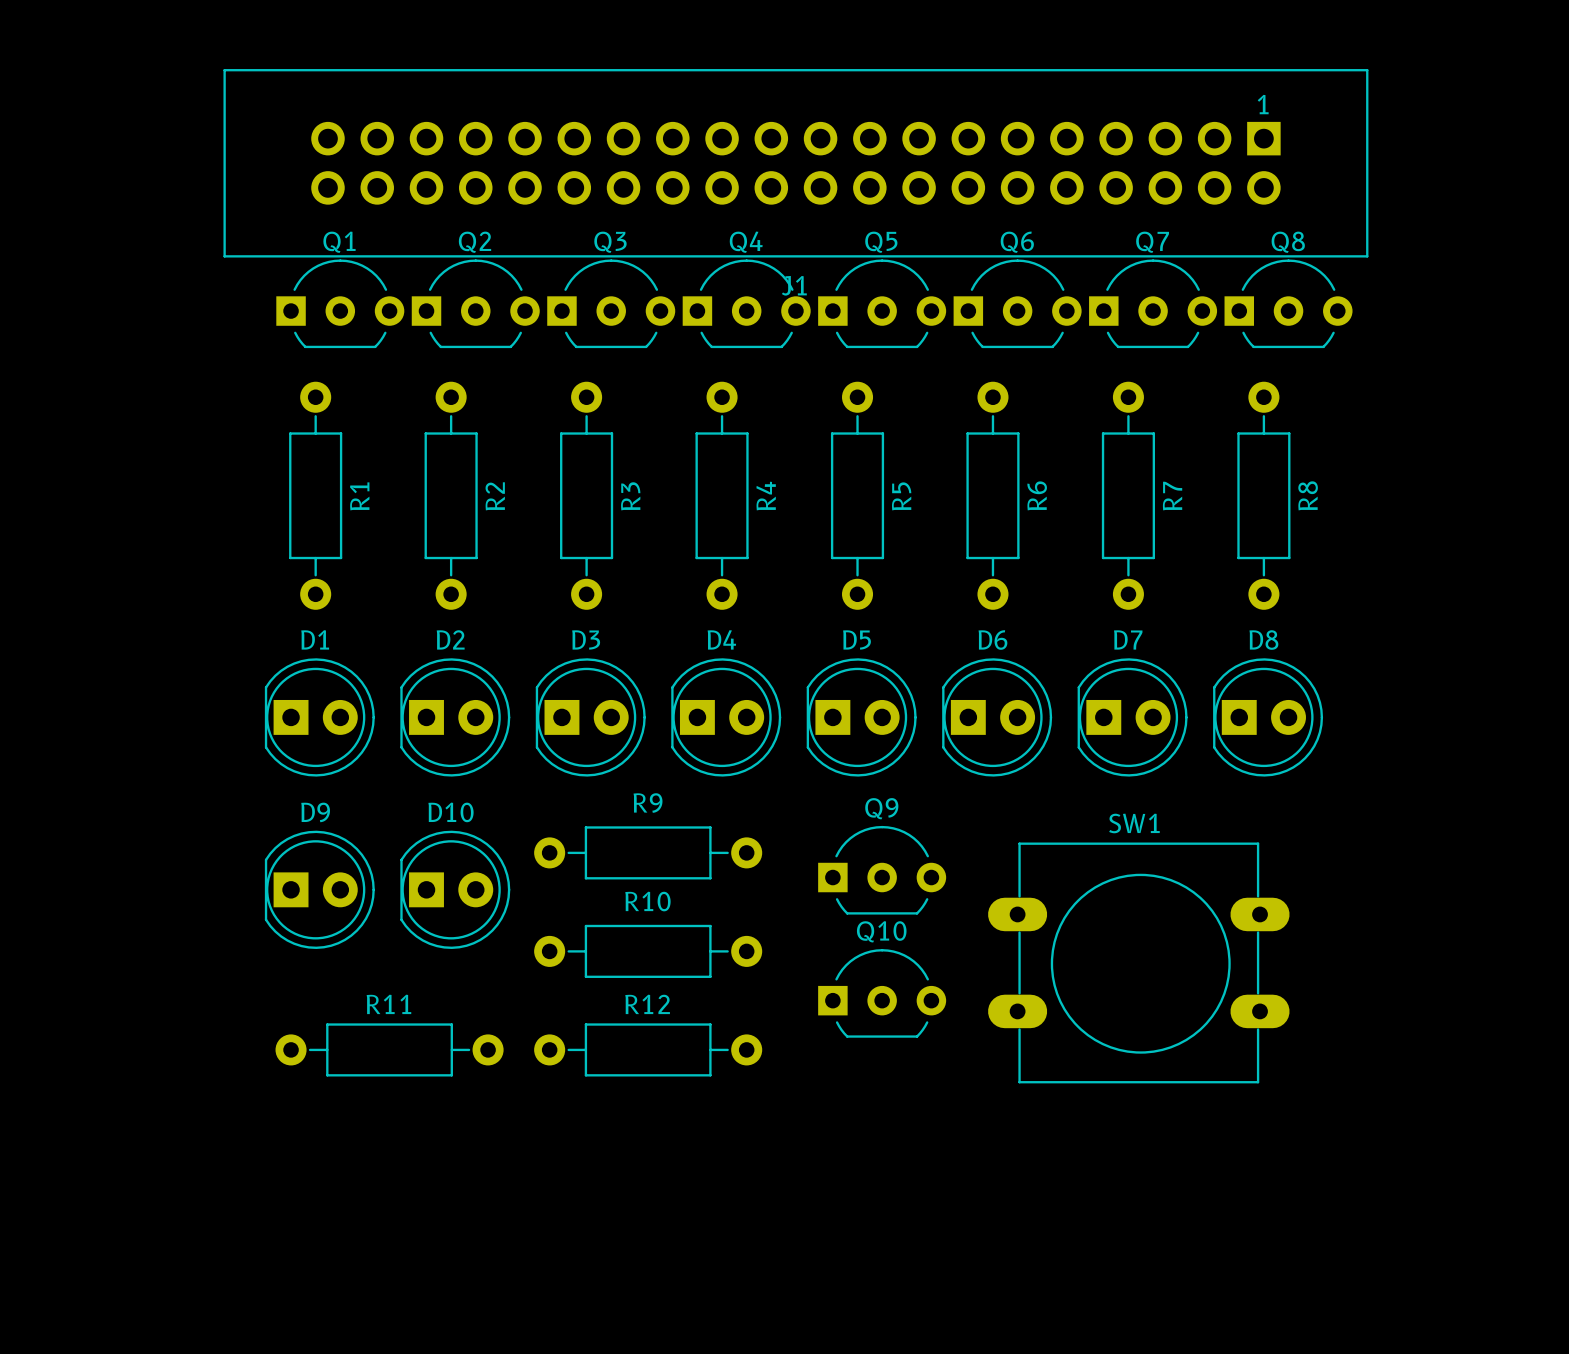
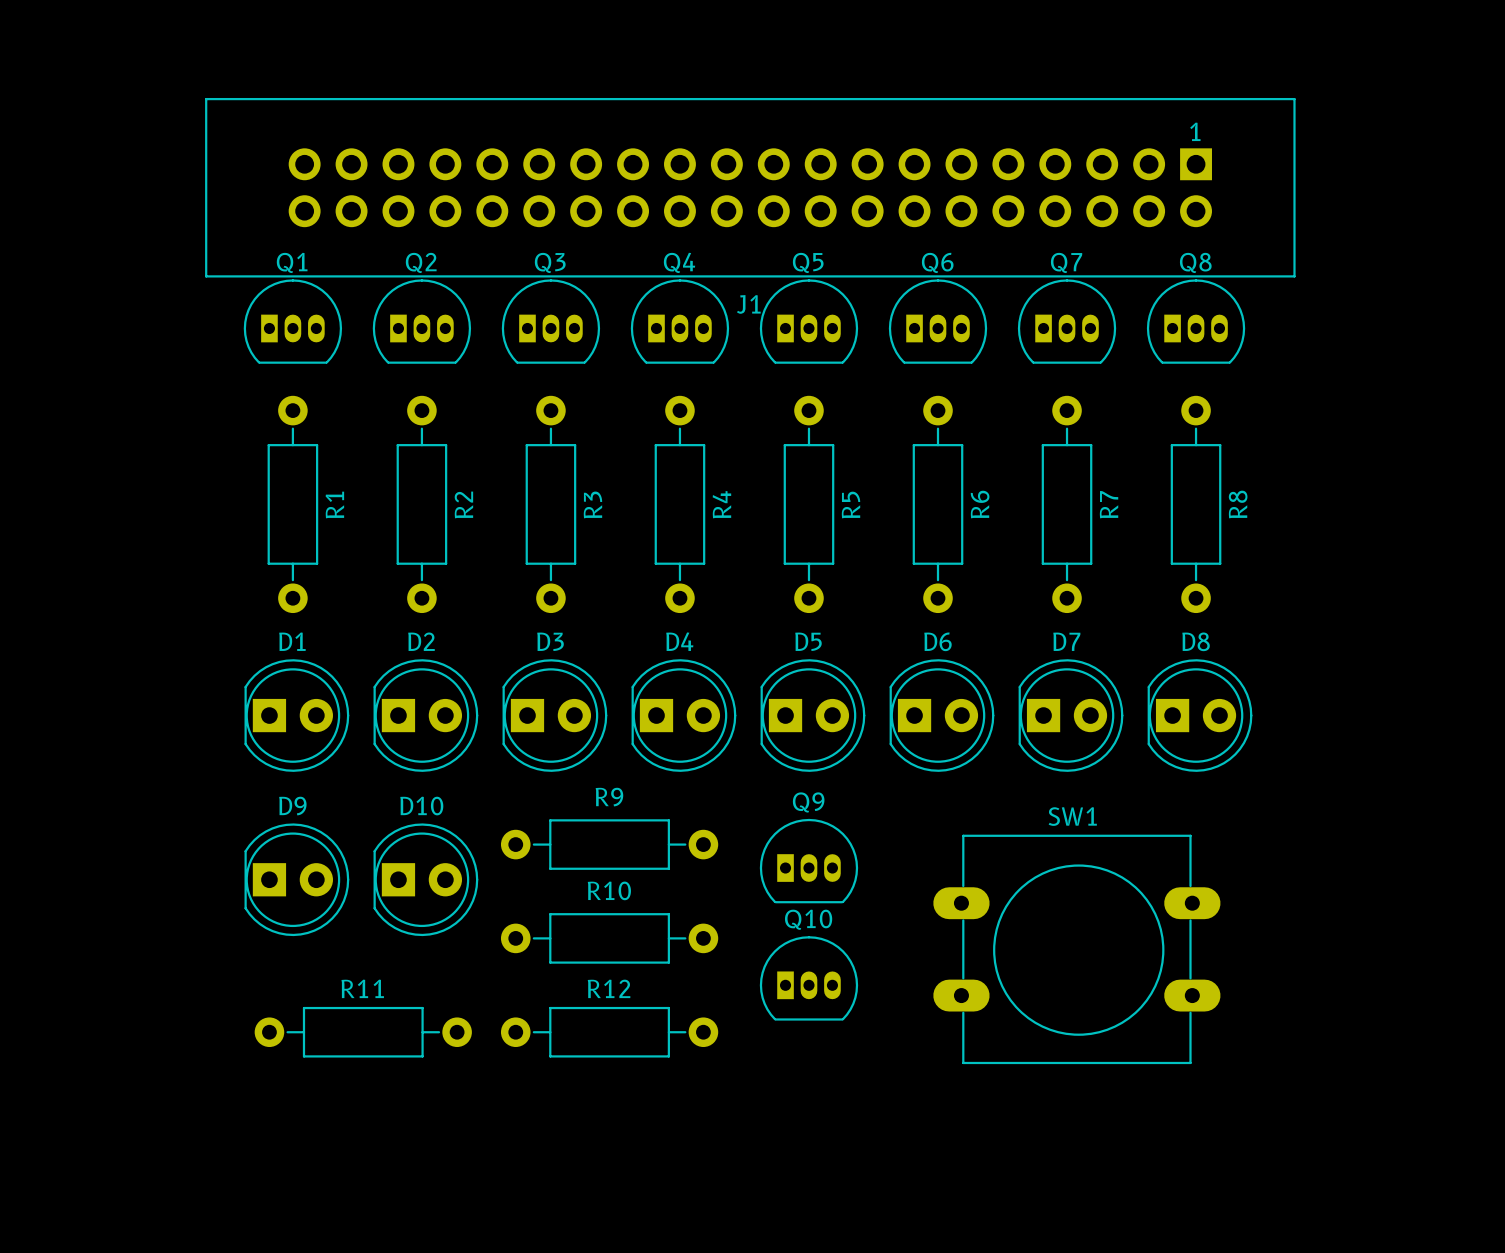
Q1 footprint: [276, 259, 405, 349] -> [243, 279, 343, 364]
Q2 footprint: [411, 259, 540, 349] -> [372, 279, 472, 364]
Q3 footprint: [547, 259, 676, 349] -> [501, 279, 601, 364]
Q4 footprint: [682, 259, 811, 349] -> [630, 279, 730, 364]
Q5 footprint: [818, 259, 947, 349] -> [759, 279, 859, 364]
Q6 footprint: [953, 259, 1082, 349] -> [888, 279, 988, 364]
Q7 footprint: [1089, 259, 1218, 349] -> [1017, 279, 1117, 364]
Q8 footprint: [1224, 259, 1353, 349] -> [1146, 279, 1246, 364]
Q9 footprint: [818, 825, 947, 915] -> [759, 818, 859, 904]
Q10 footprint: [818, 949, 947, 1038] -> [759, 936, 859, 1021]

